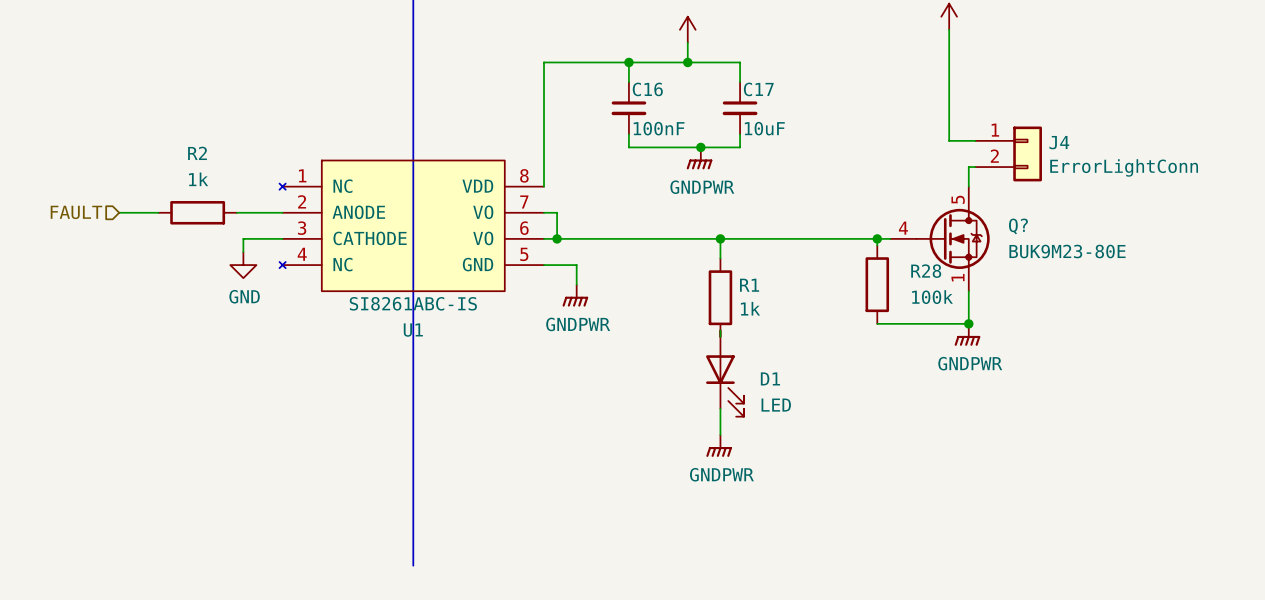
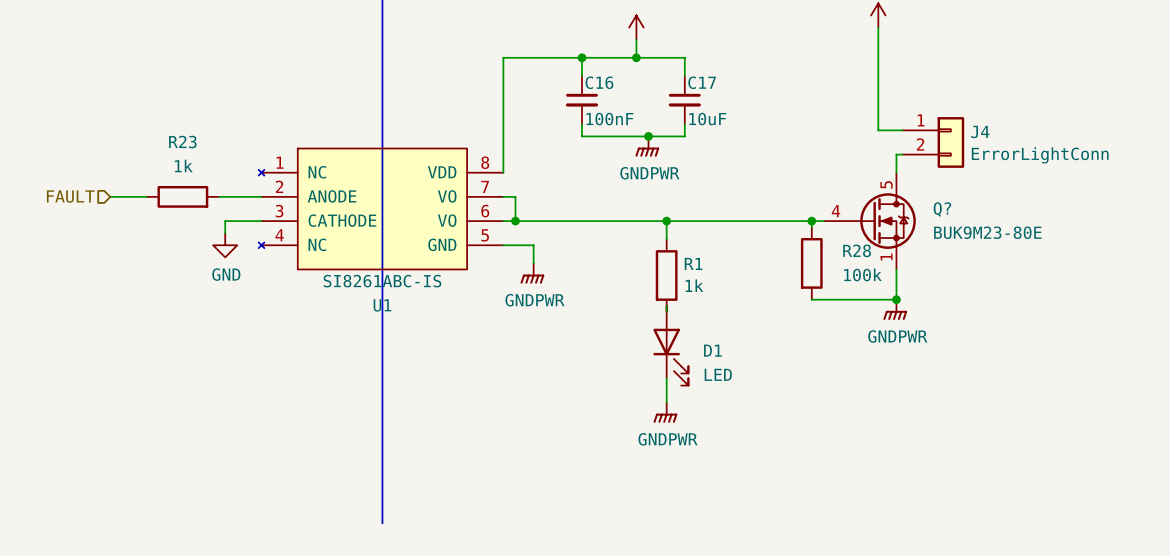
R2 name: R2 (197, 153) -> R23 (182, 142)

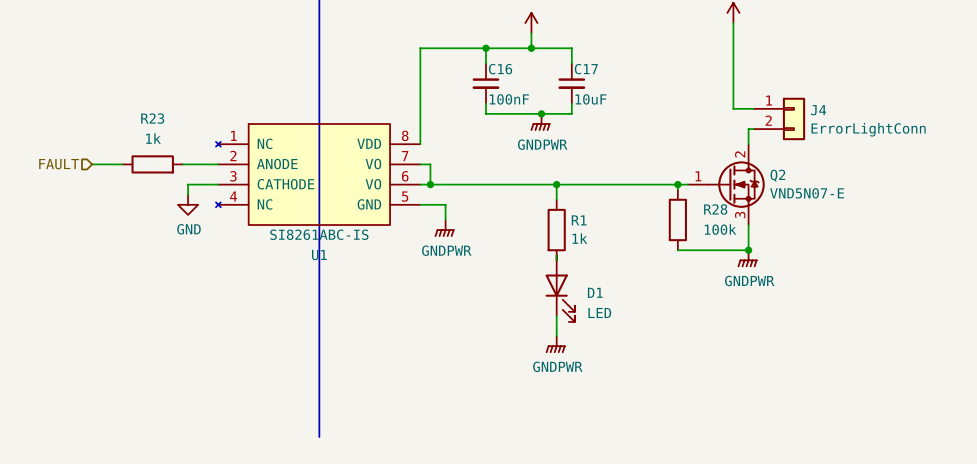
Q? pin number: 5 (886, 184) -> 2 (740, 154)
Q? name: Q? (942, 209) -> Q2 (777, 175)
Q? pin number: 4 (836, 211) -> 1 (698, 176)
Q? value: BUK9M23-80E (987, 232) -> VND5N07-E (807, 193)
Q? pin number: 1 (886, 256) -> 3 (740, 214)

